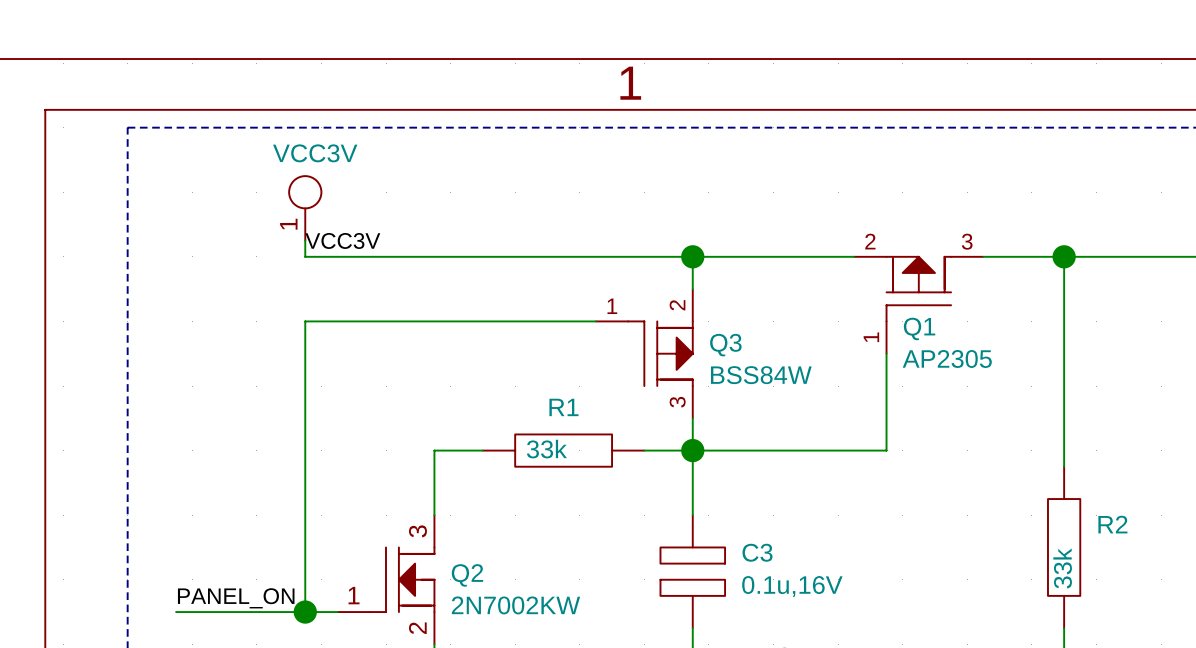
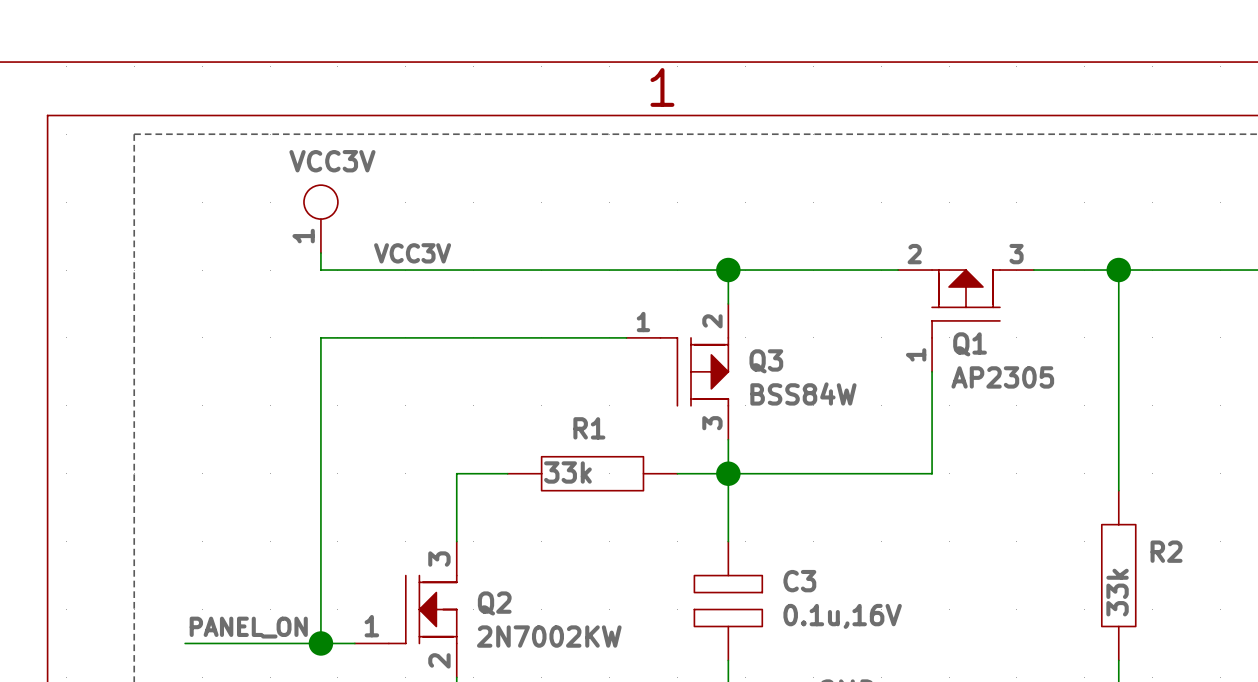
label position: VCC3V (342, 240) -> VCC3V (412, 253)

